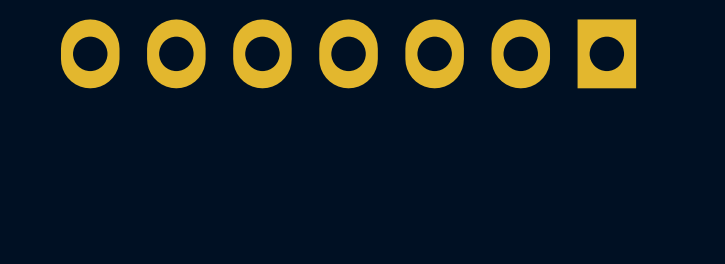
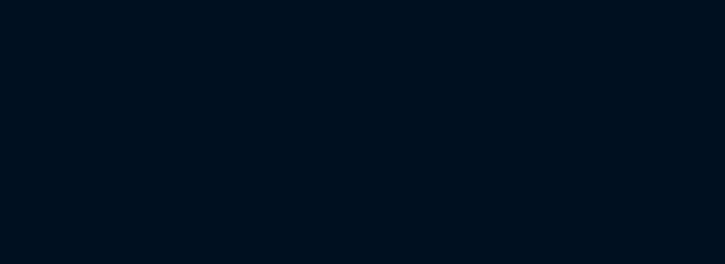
part: (348, 53) -> none

